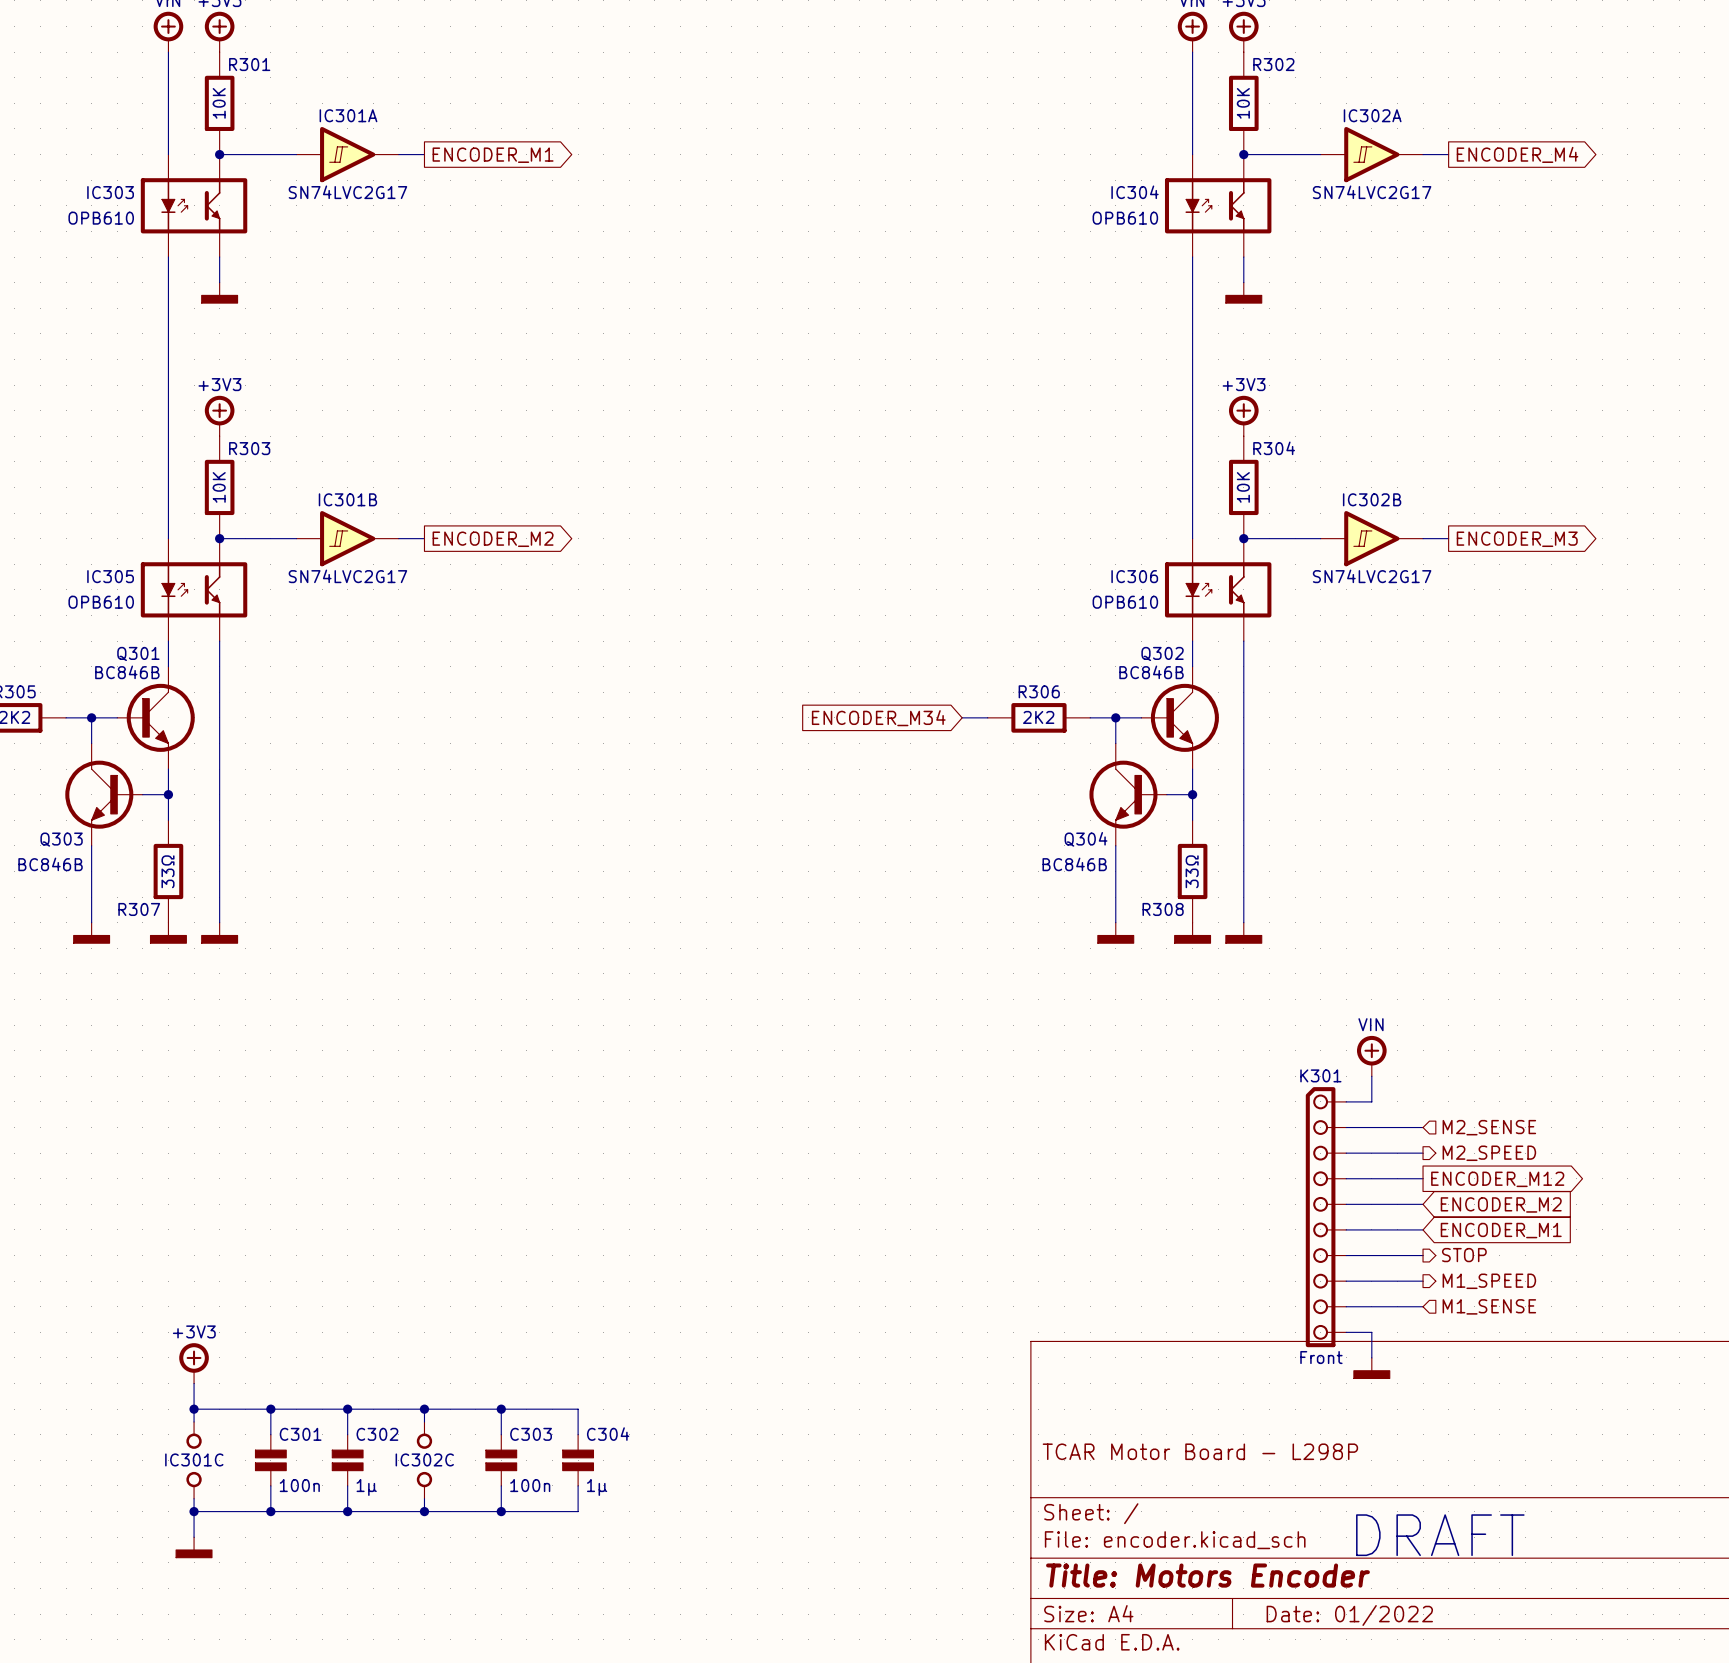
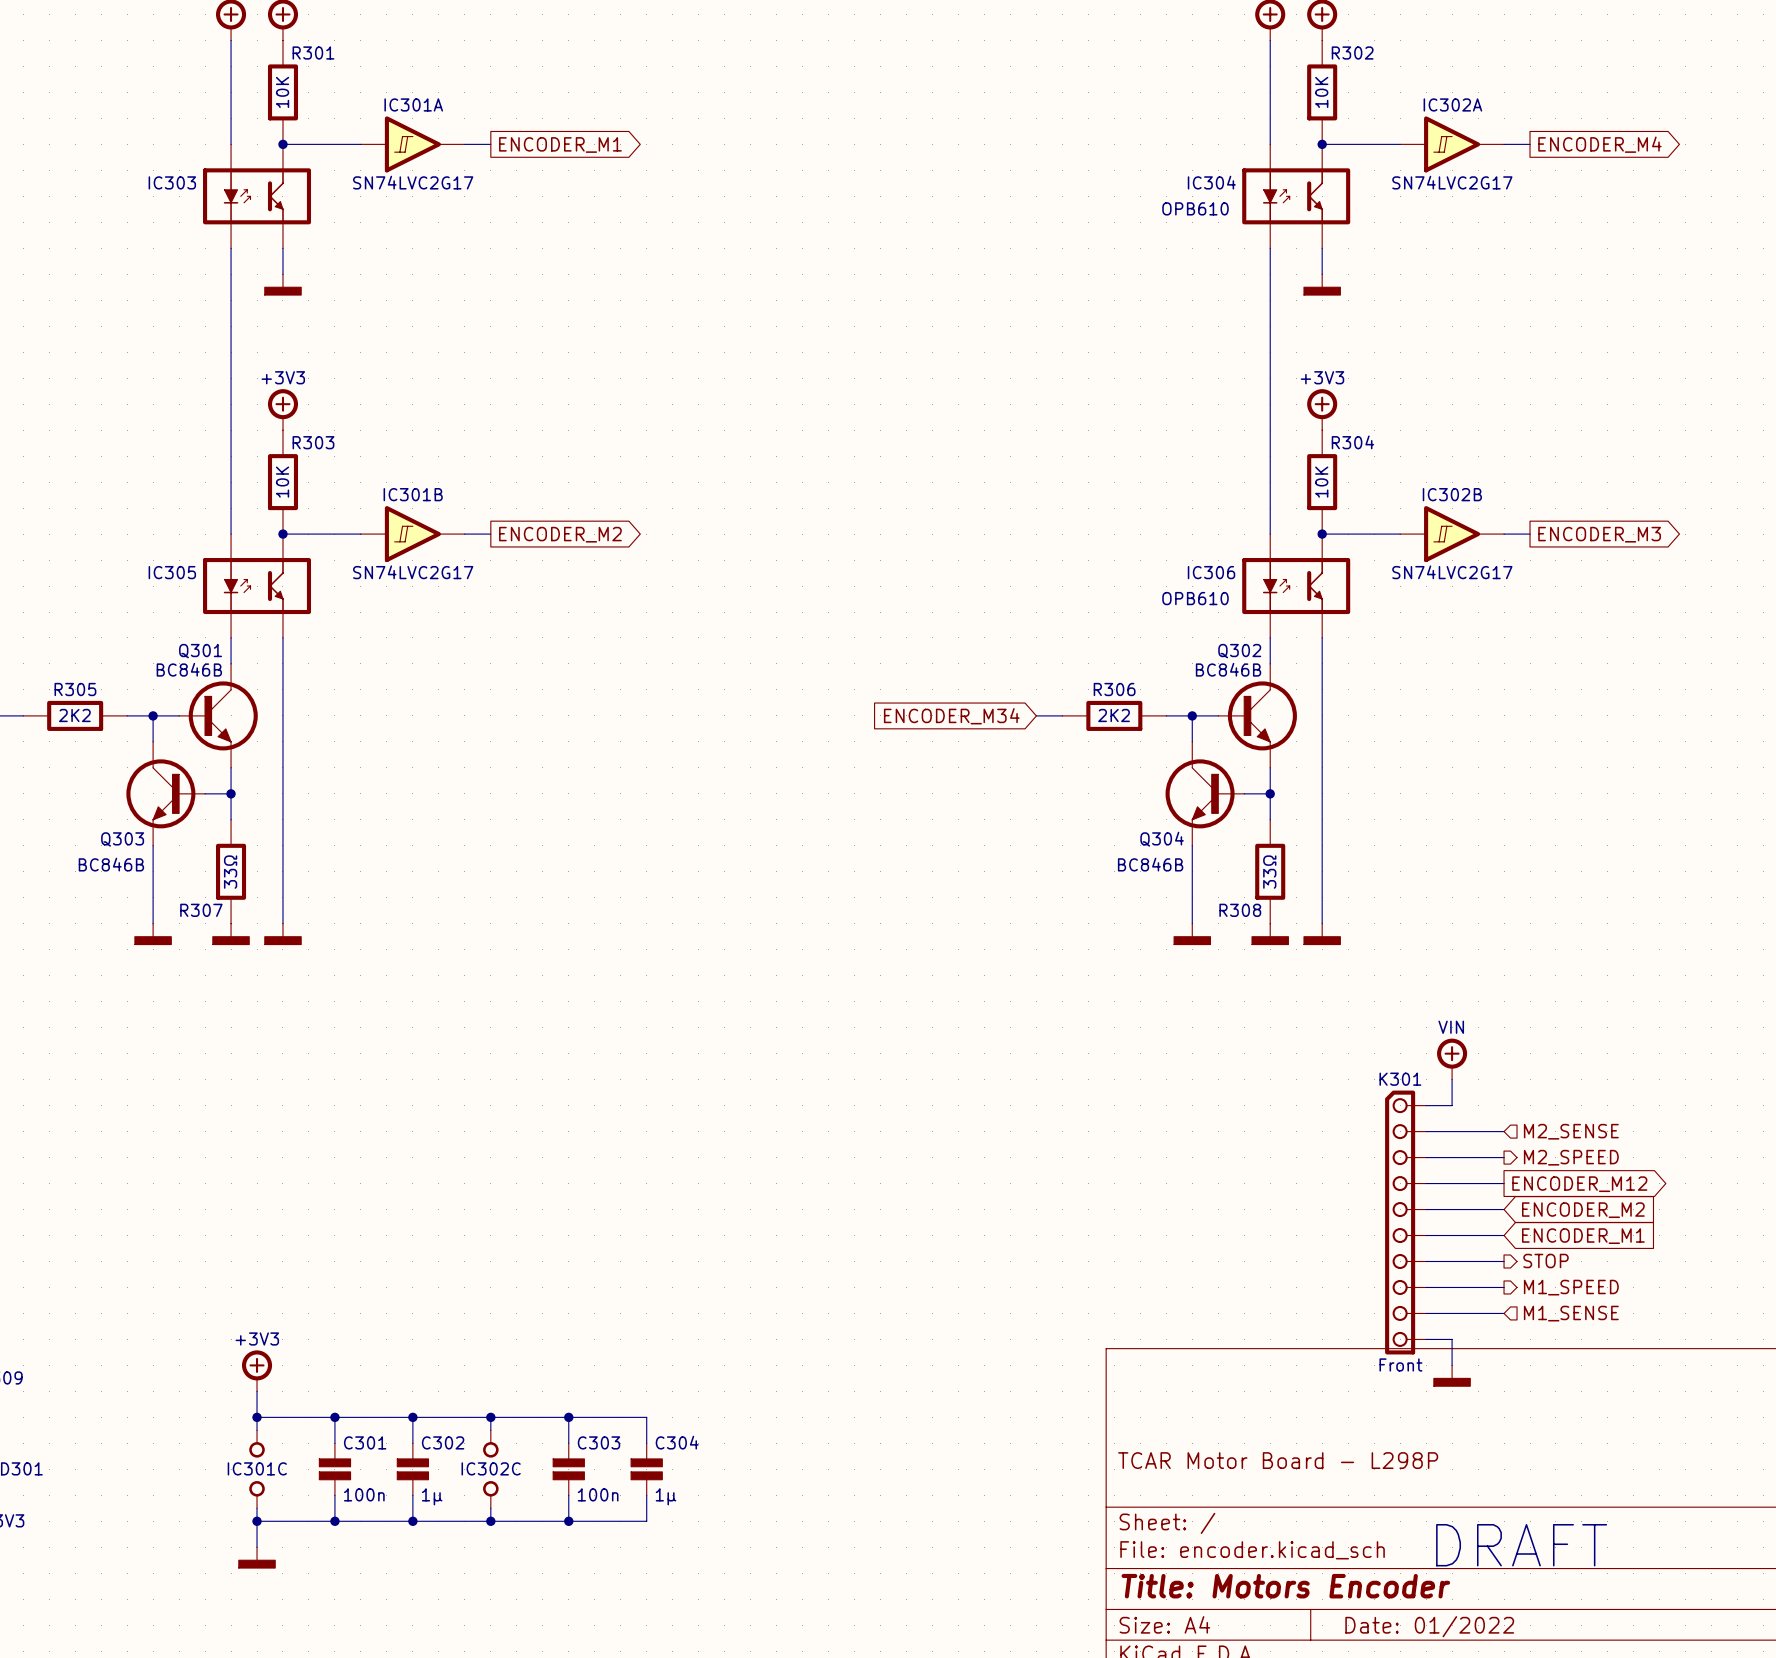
IC303 value: OPB610 (101, 218) -> none
IC304 text: none -> OPB610 (1195, 208)
IC304 value: OPB610 (1125, 218) -> none
IC305 value: OPB610 (101, 602) -> none
IC306 text: none -> OPB610 (1195, 598)
IC306 value: OPB610 (1125, 602) -> none

